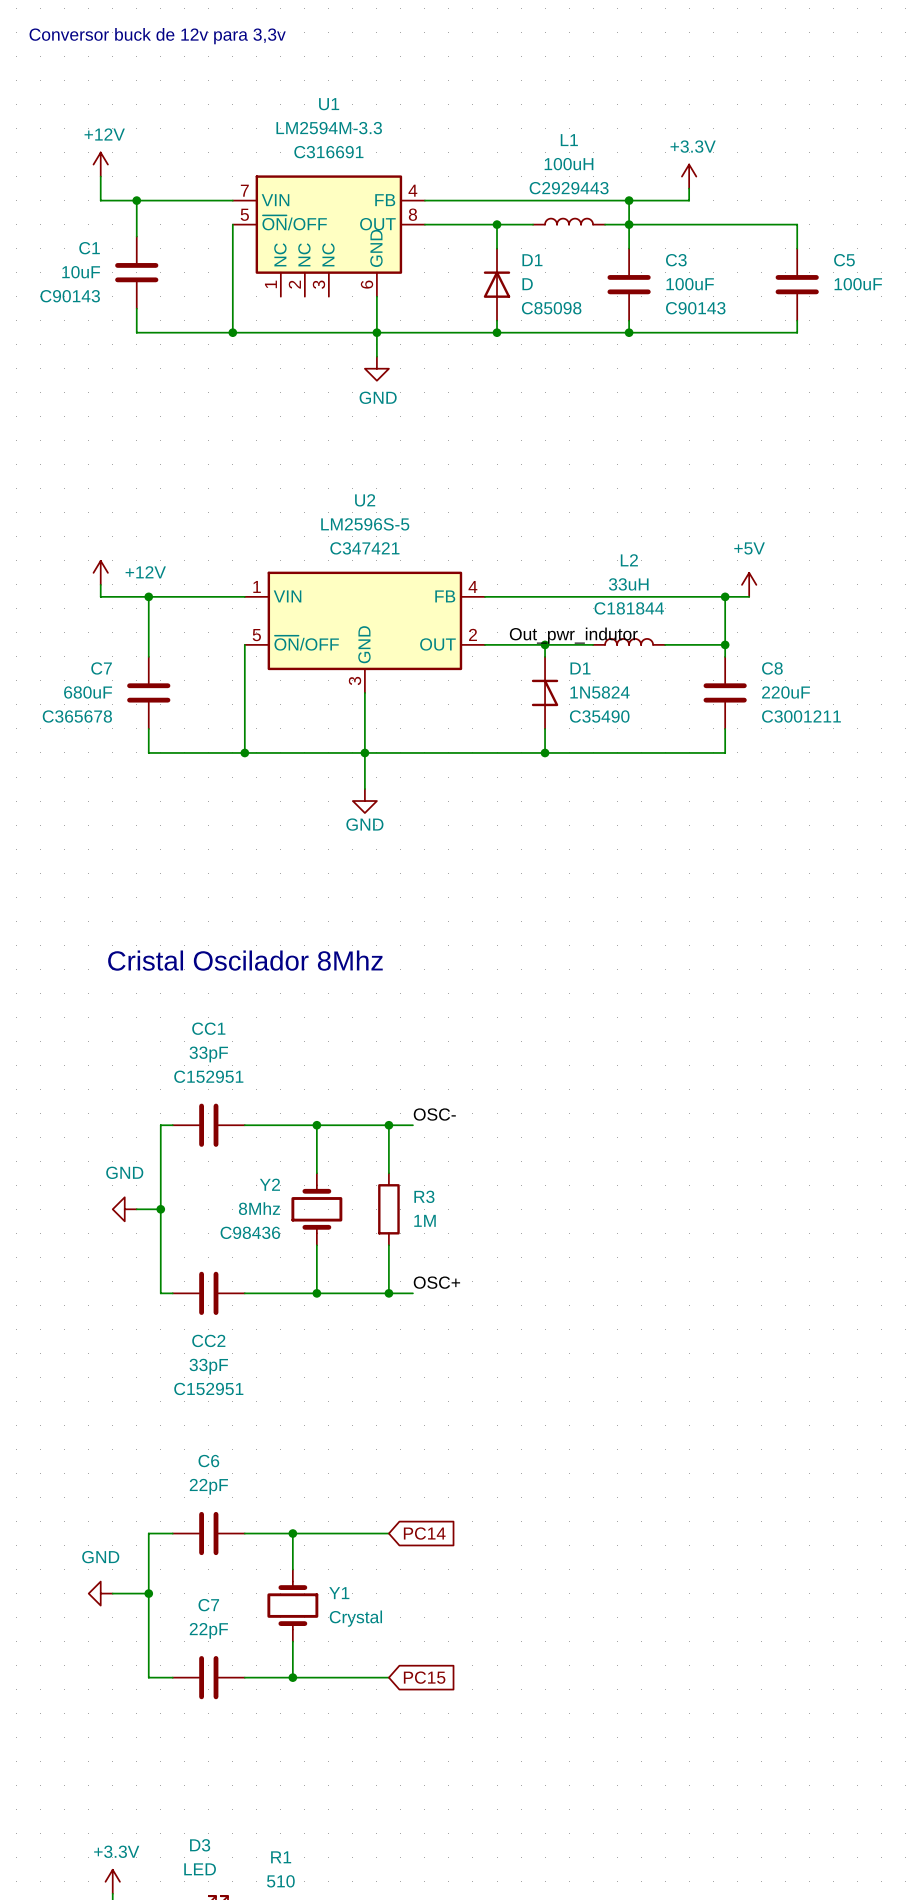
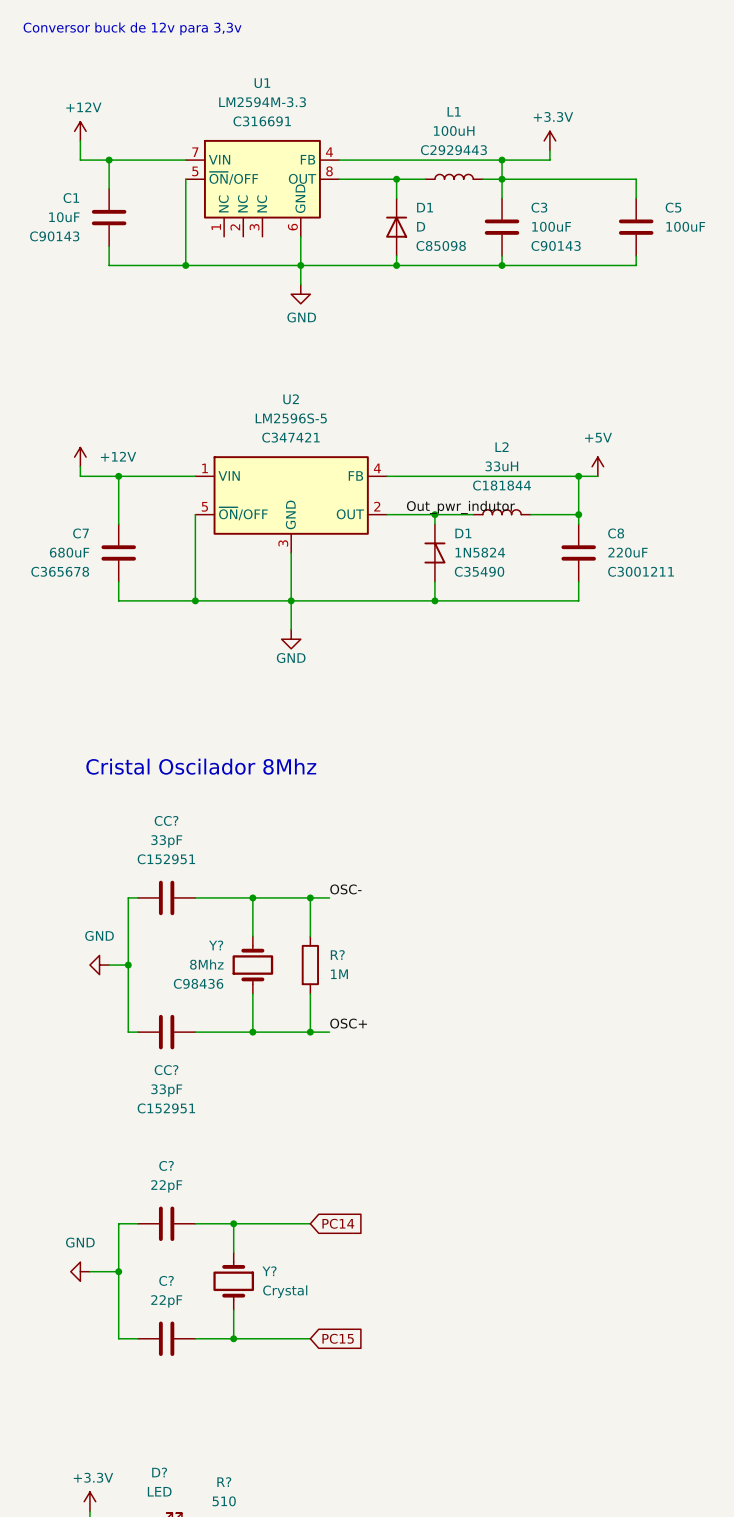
CC1 name: CC1 (208, 1028) -> CC? (166, 820)
Y2 name: Y2 (269, 1184) -> Y? (216, 945)
R3 name: R3 (424, 1196) -> R? (337, 955)
CC2 name: CC2 (208, 1340) -> CC? (166, 1070)
C6 name: C6 (208, 1461) -> C? (166, 1165)
Y1 name: Y1 (339, 1593) -> Y? (269, 1271)
C7 name: C7 (208, 1605) -> C? (166, 1280)
D3 name: D3 (200, 1845) -> D? (159, 1472)
R1 name: R1 (281, 1857) -> R? (224, 1482)

